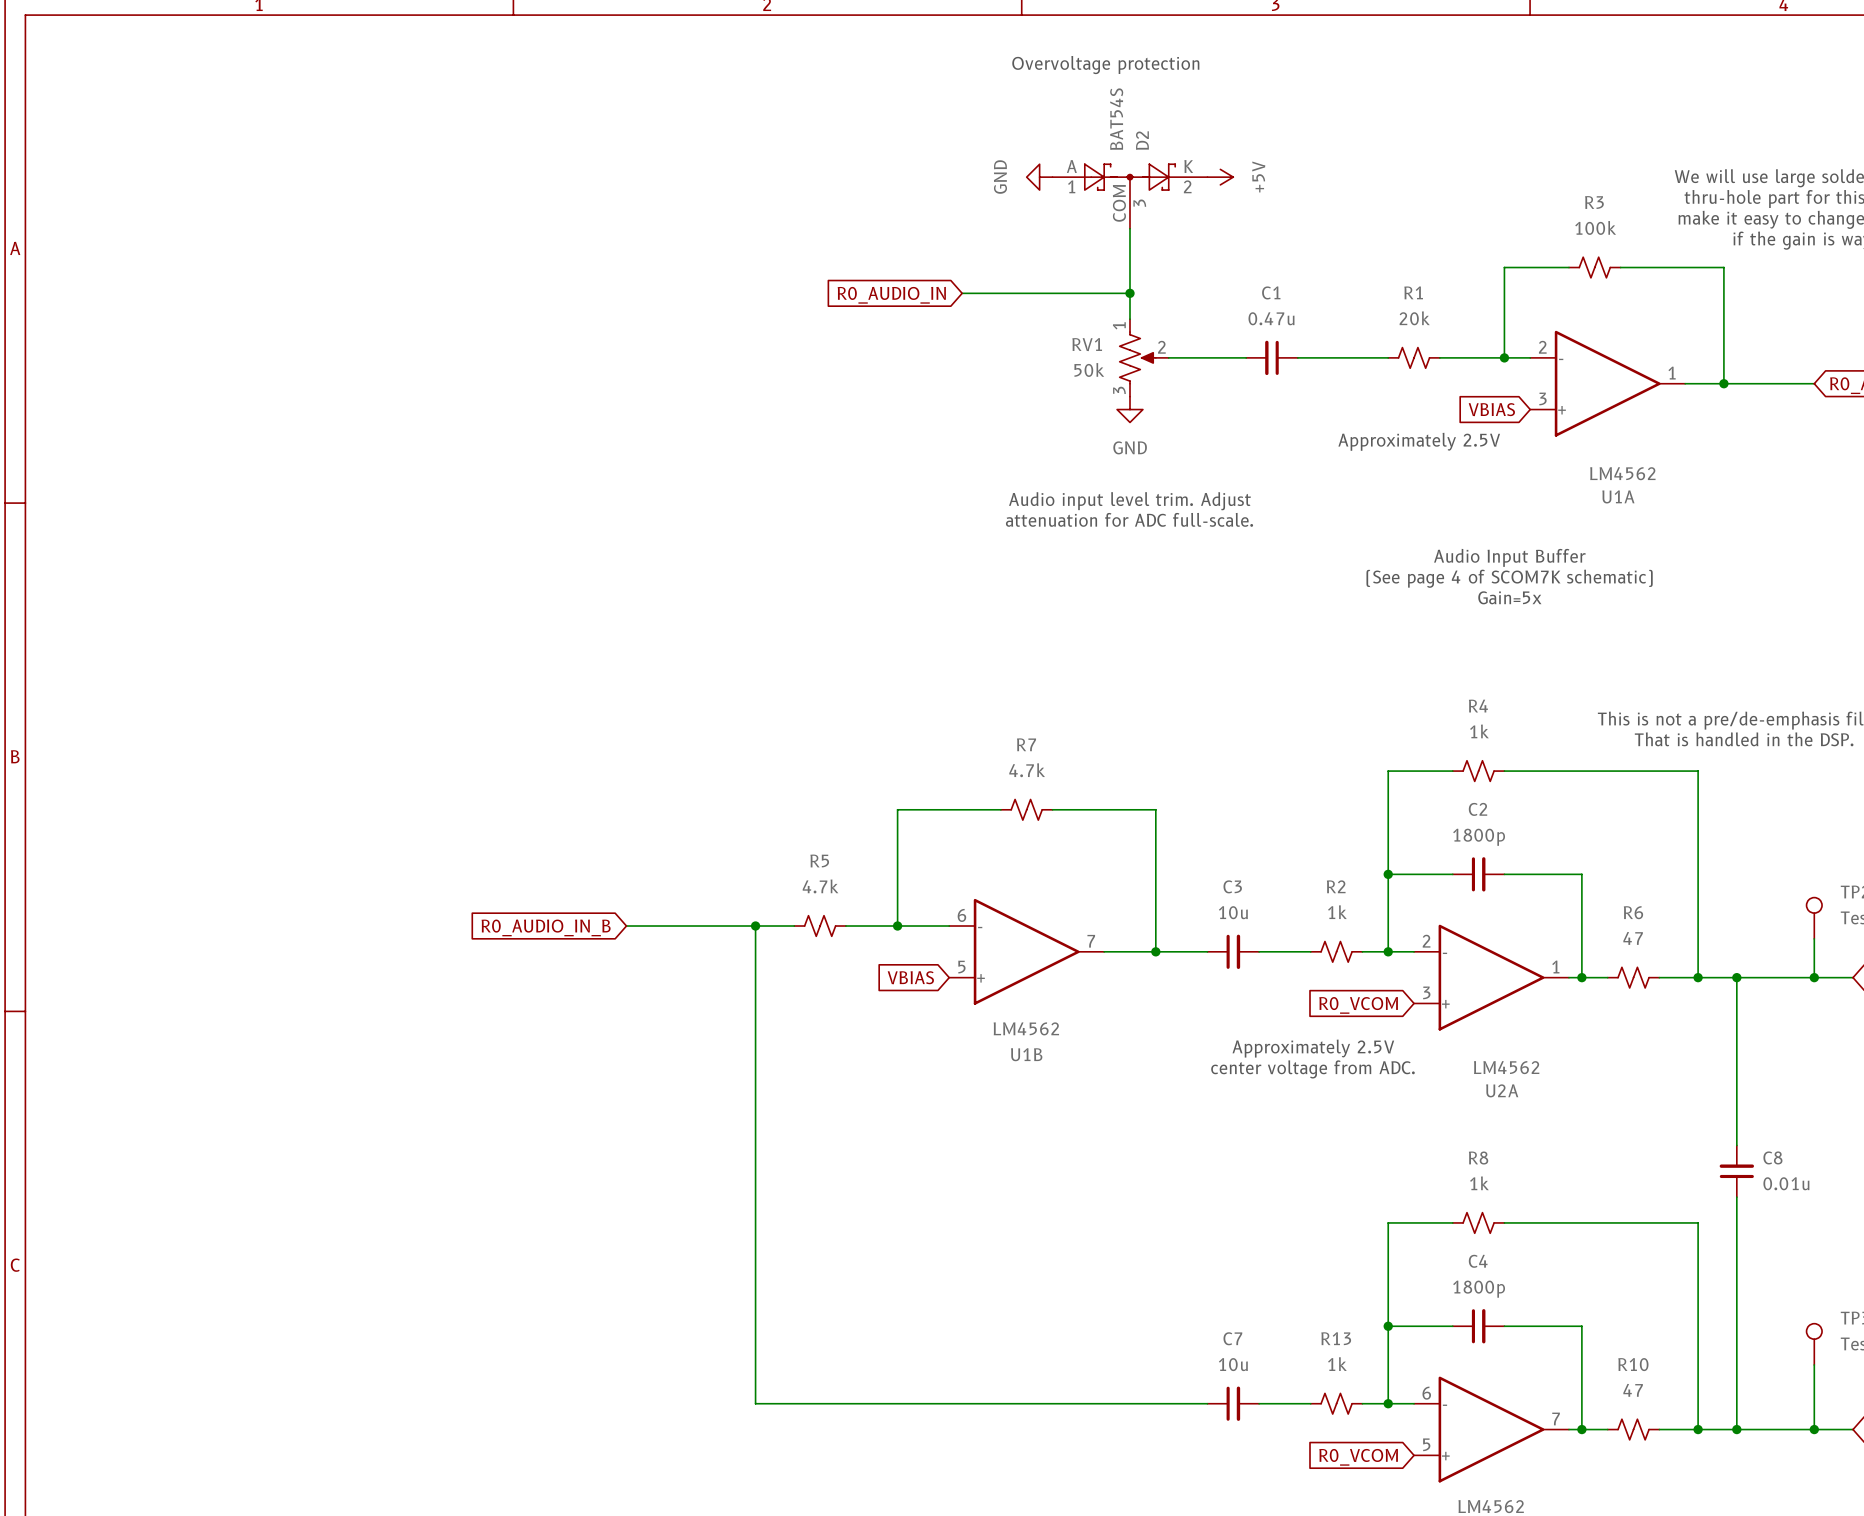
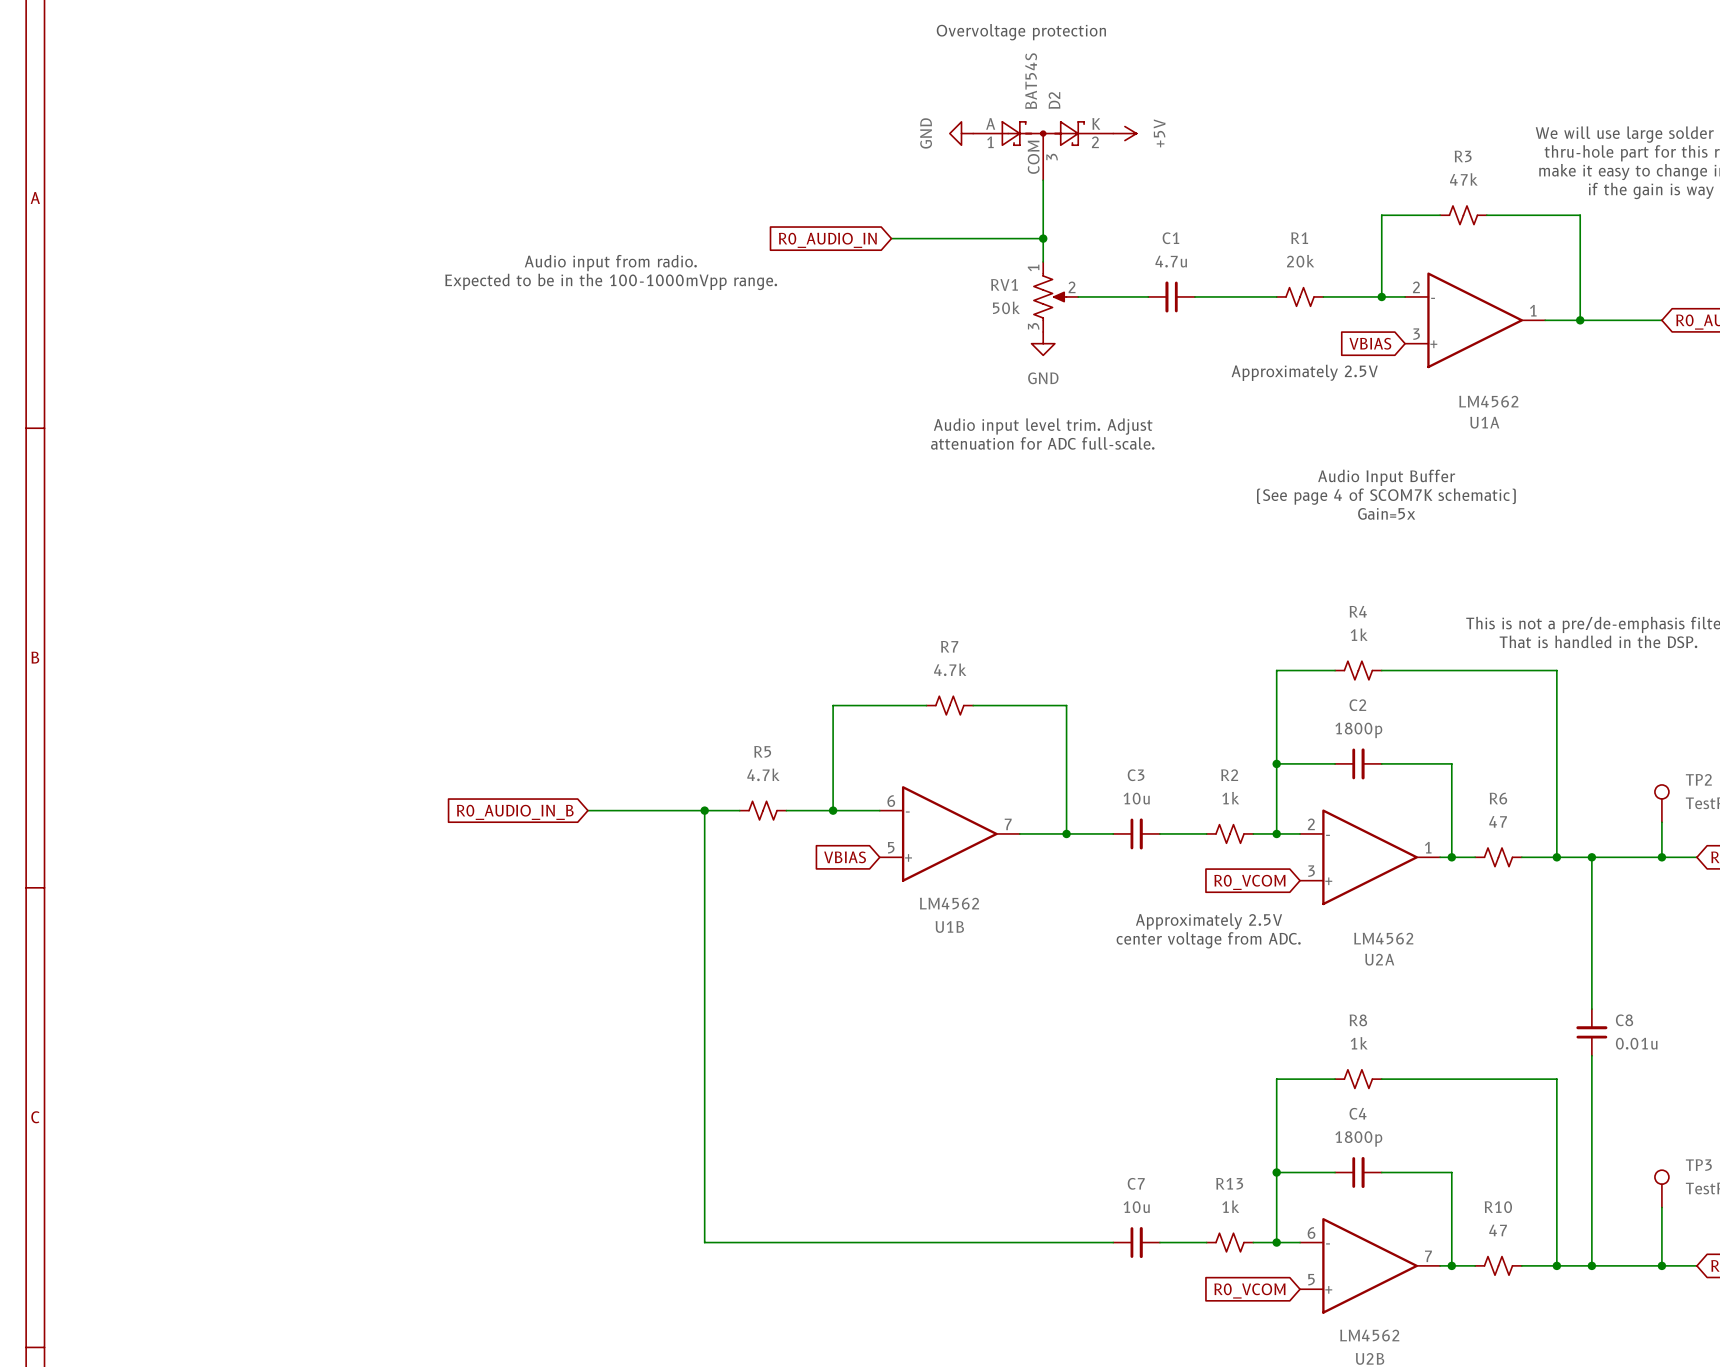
R3 value: 100k (1595, 227) -> 47k (1463, 179)
C1 value: 0.47u (1271, 318) -> 4.7u (1171, 261)
text: none -> Audio input from radio. (610, 263)
text: none -> Expected to be in the 100-1000mVpp range. (611, 281)

